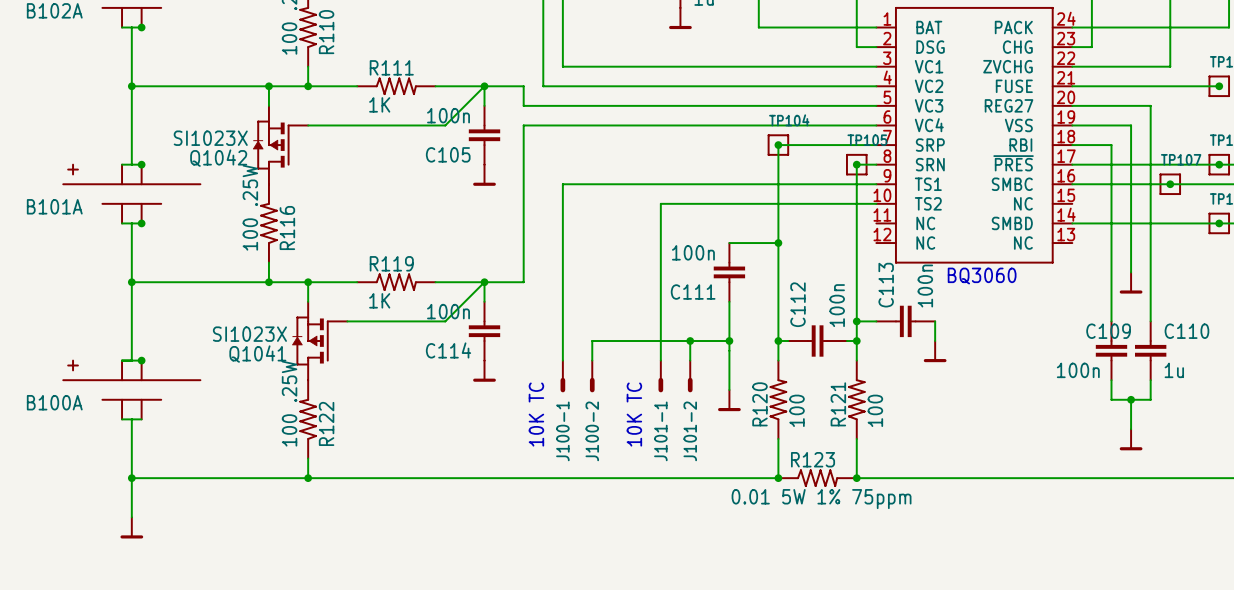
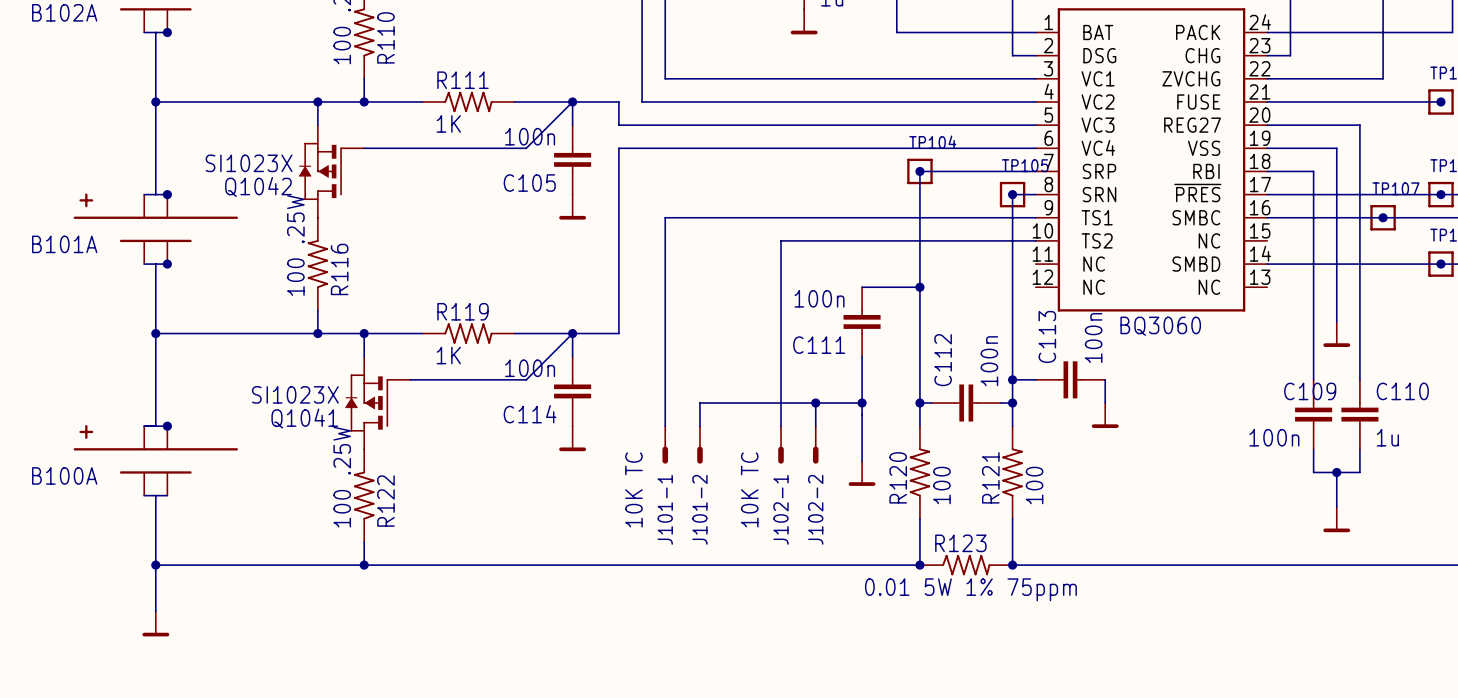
J100-1 name: J100-1 (562, 431) -> J101-1 (665, 509)
J100-2 name: J100-2 (592, 431) -> J101-2 (699, 509)
J101-1 name: J101-1 (660, 431) -> J102-1 (781, 509)
J101-2 name: J101-2 (690, 431) -> J102-2 (815, 509)

